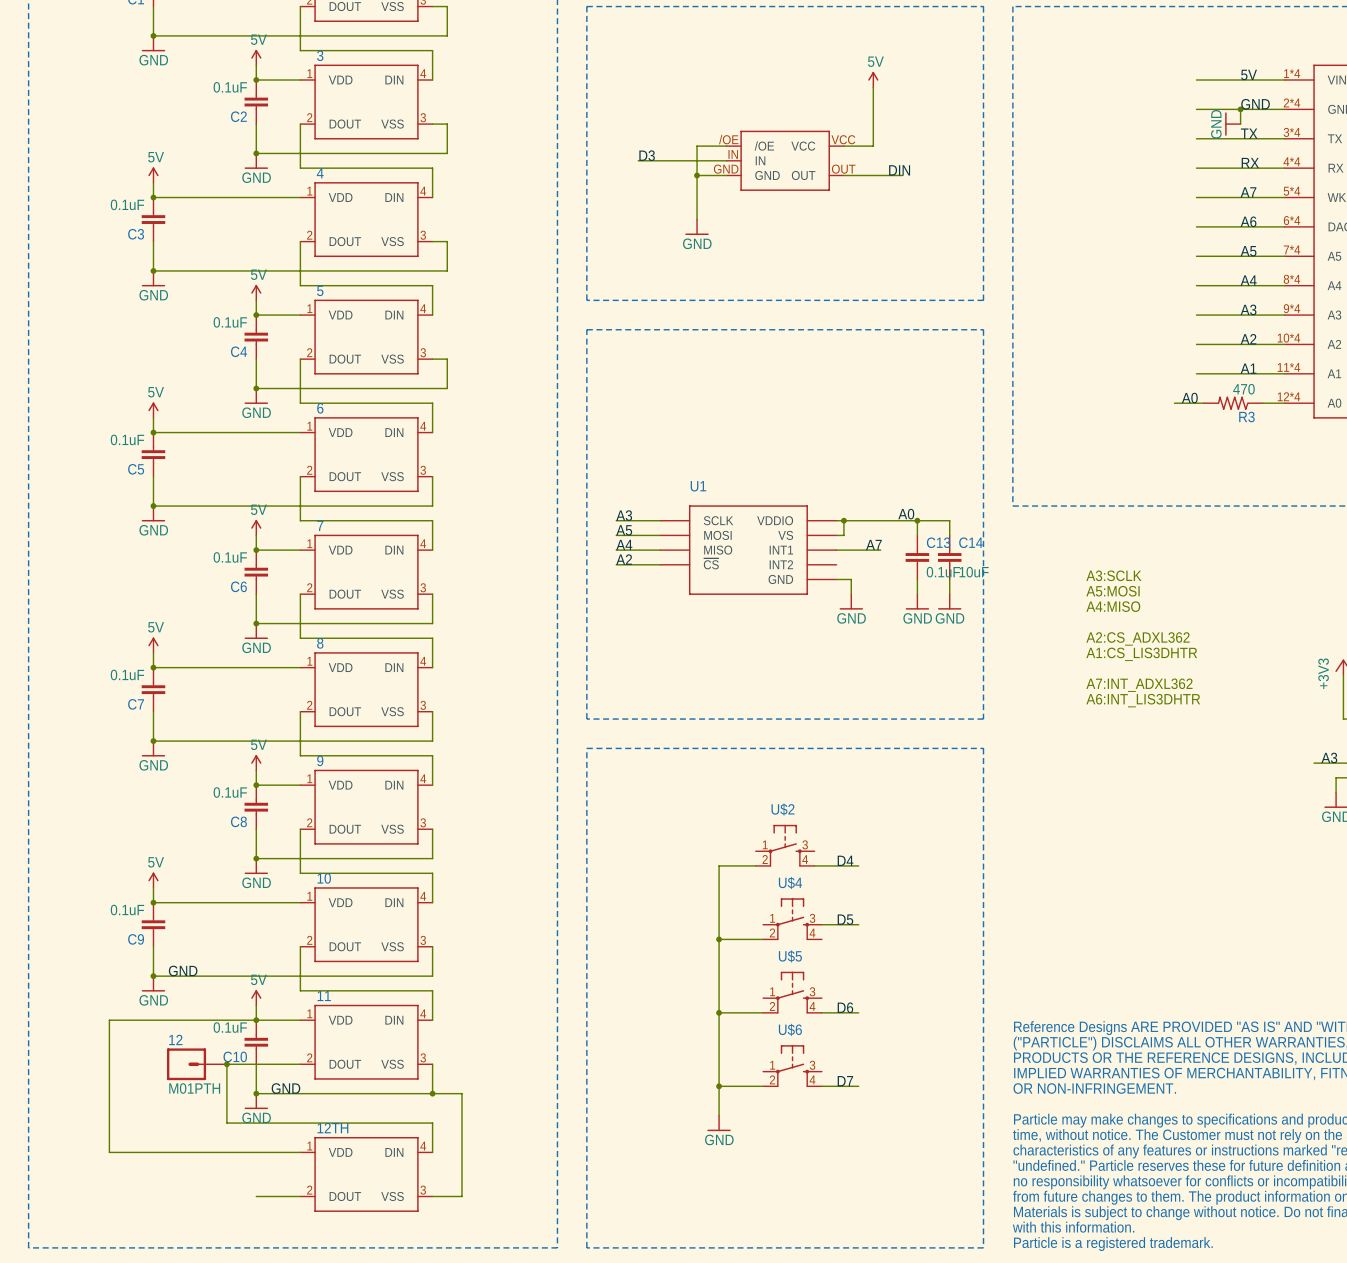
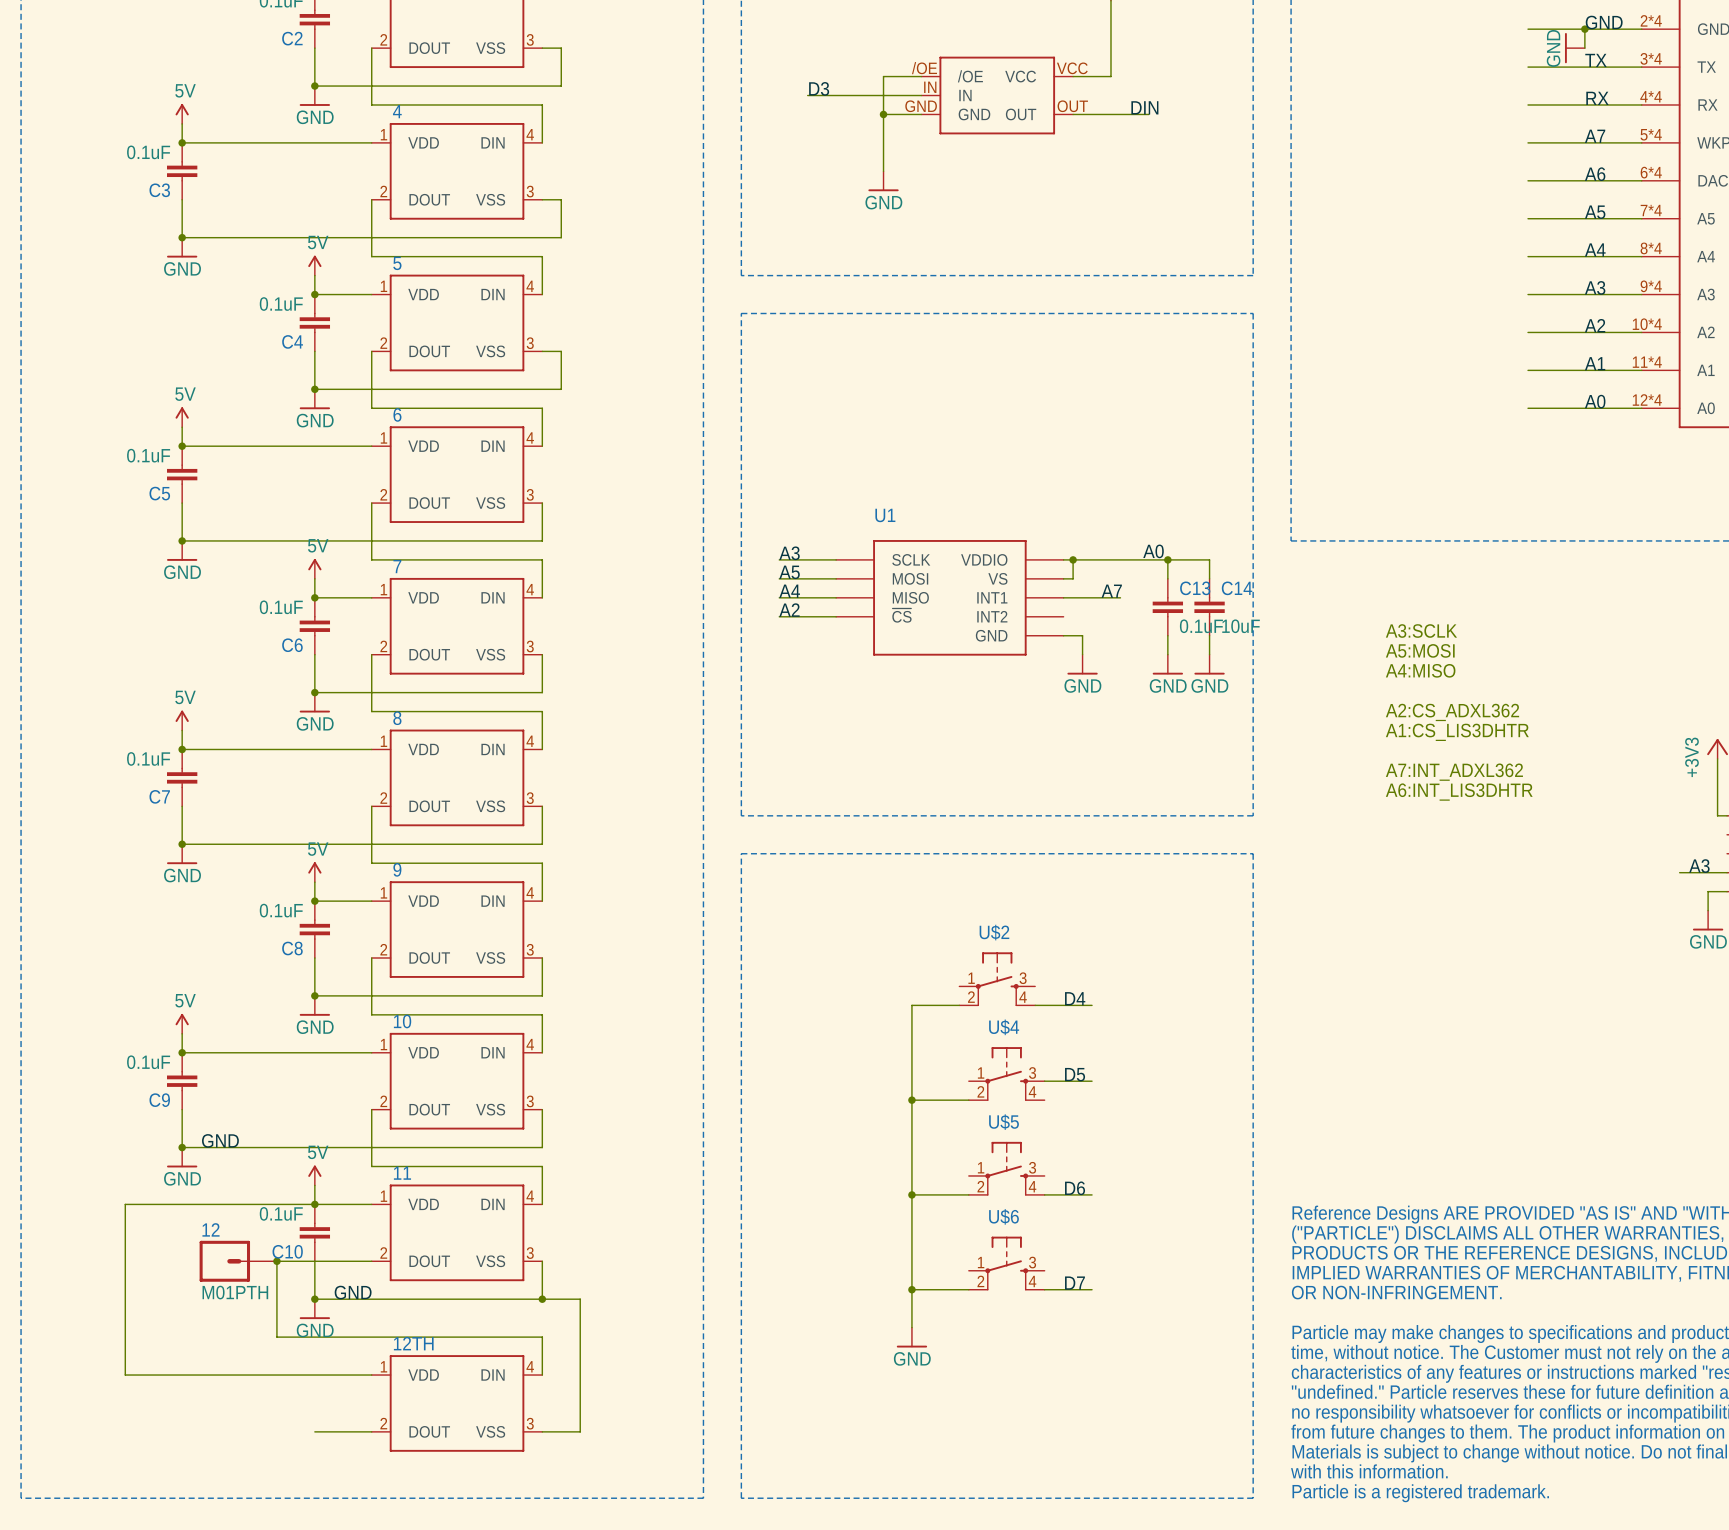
label position: A0 (1189, 398) -> A0 (1595, 401)
wire: (1174, 403) (1196, 403) -> none
R3: 470 (1233, 403) -> none

